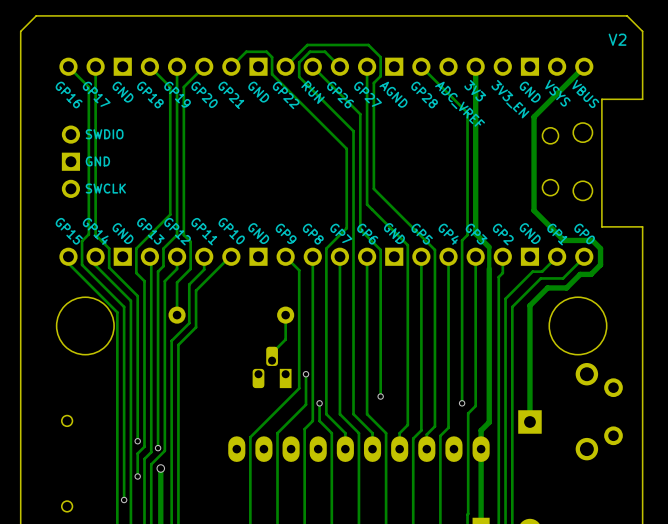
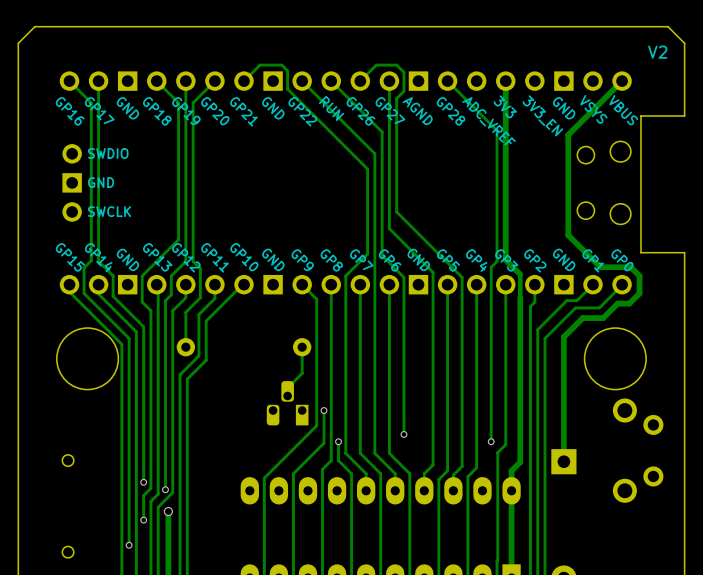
track: (380, 58) (368, 45) (307, 45) (285, 66) -> (403, 72) (396, 65) (376, 65) (360, 81)
track: (339, 66) (325, 51) (309, 51) (299, 62) (299, 76) (353, 131) (353, 134) -> (302, 81) (374, 153)

